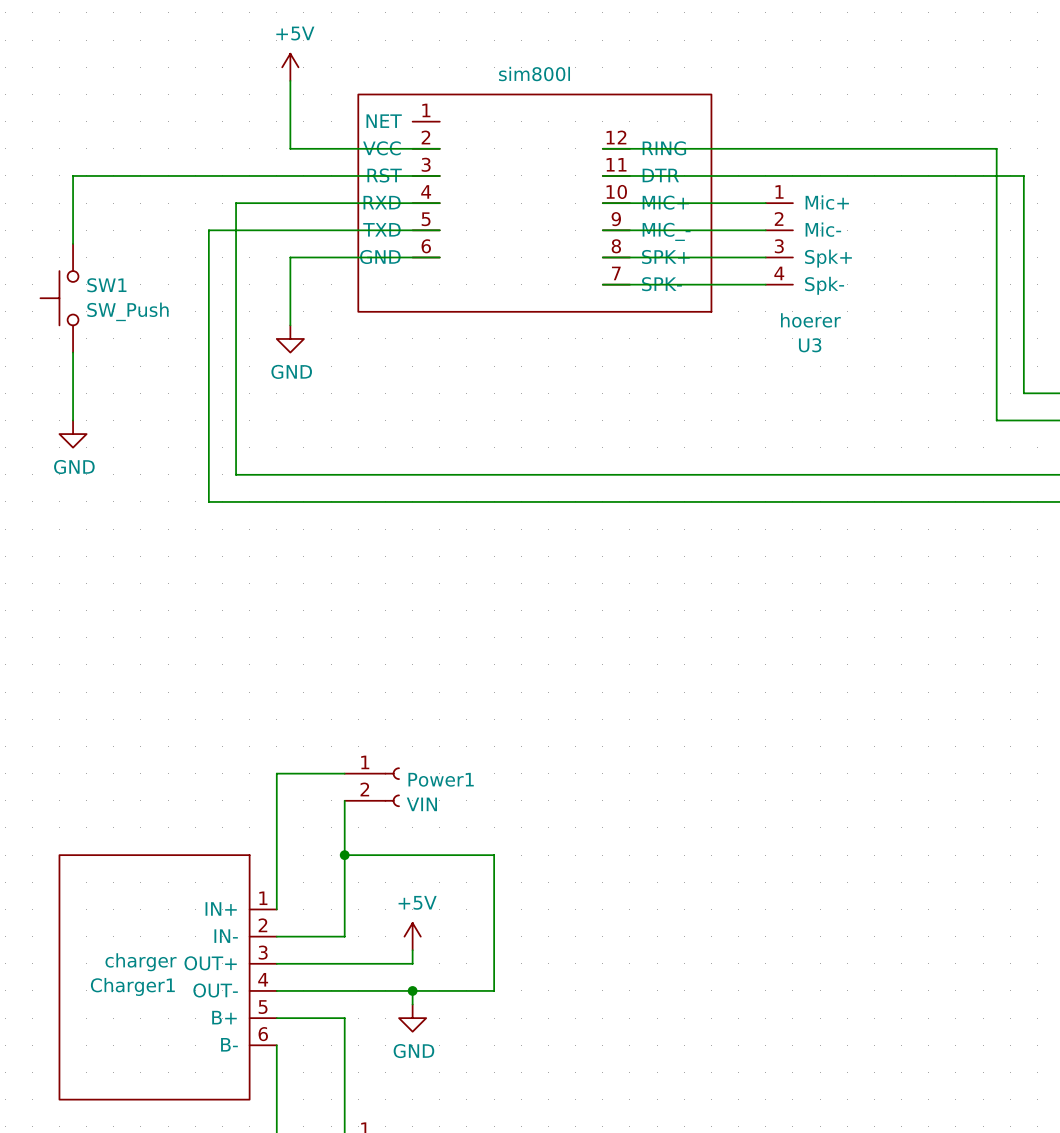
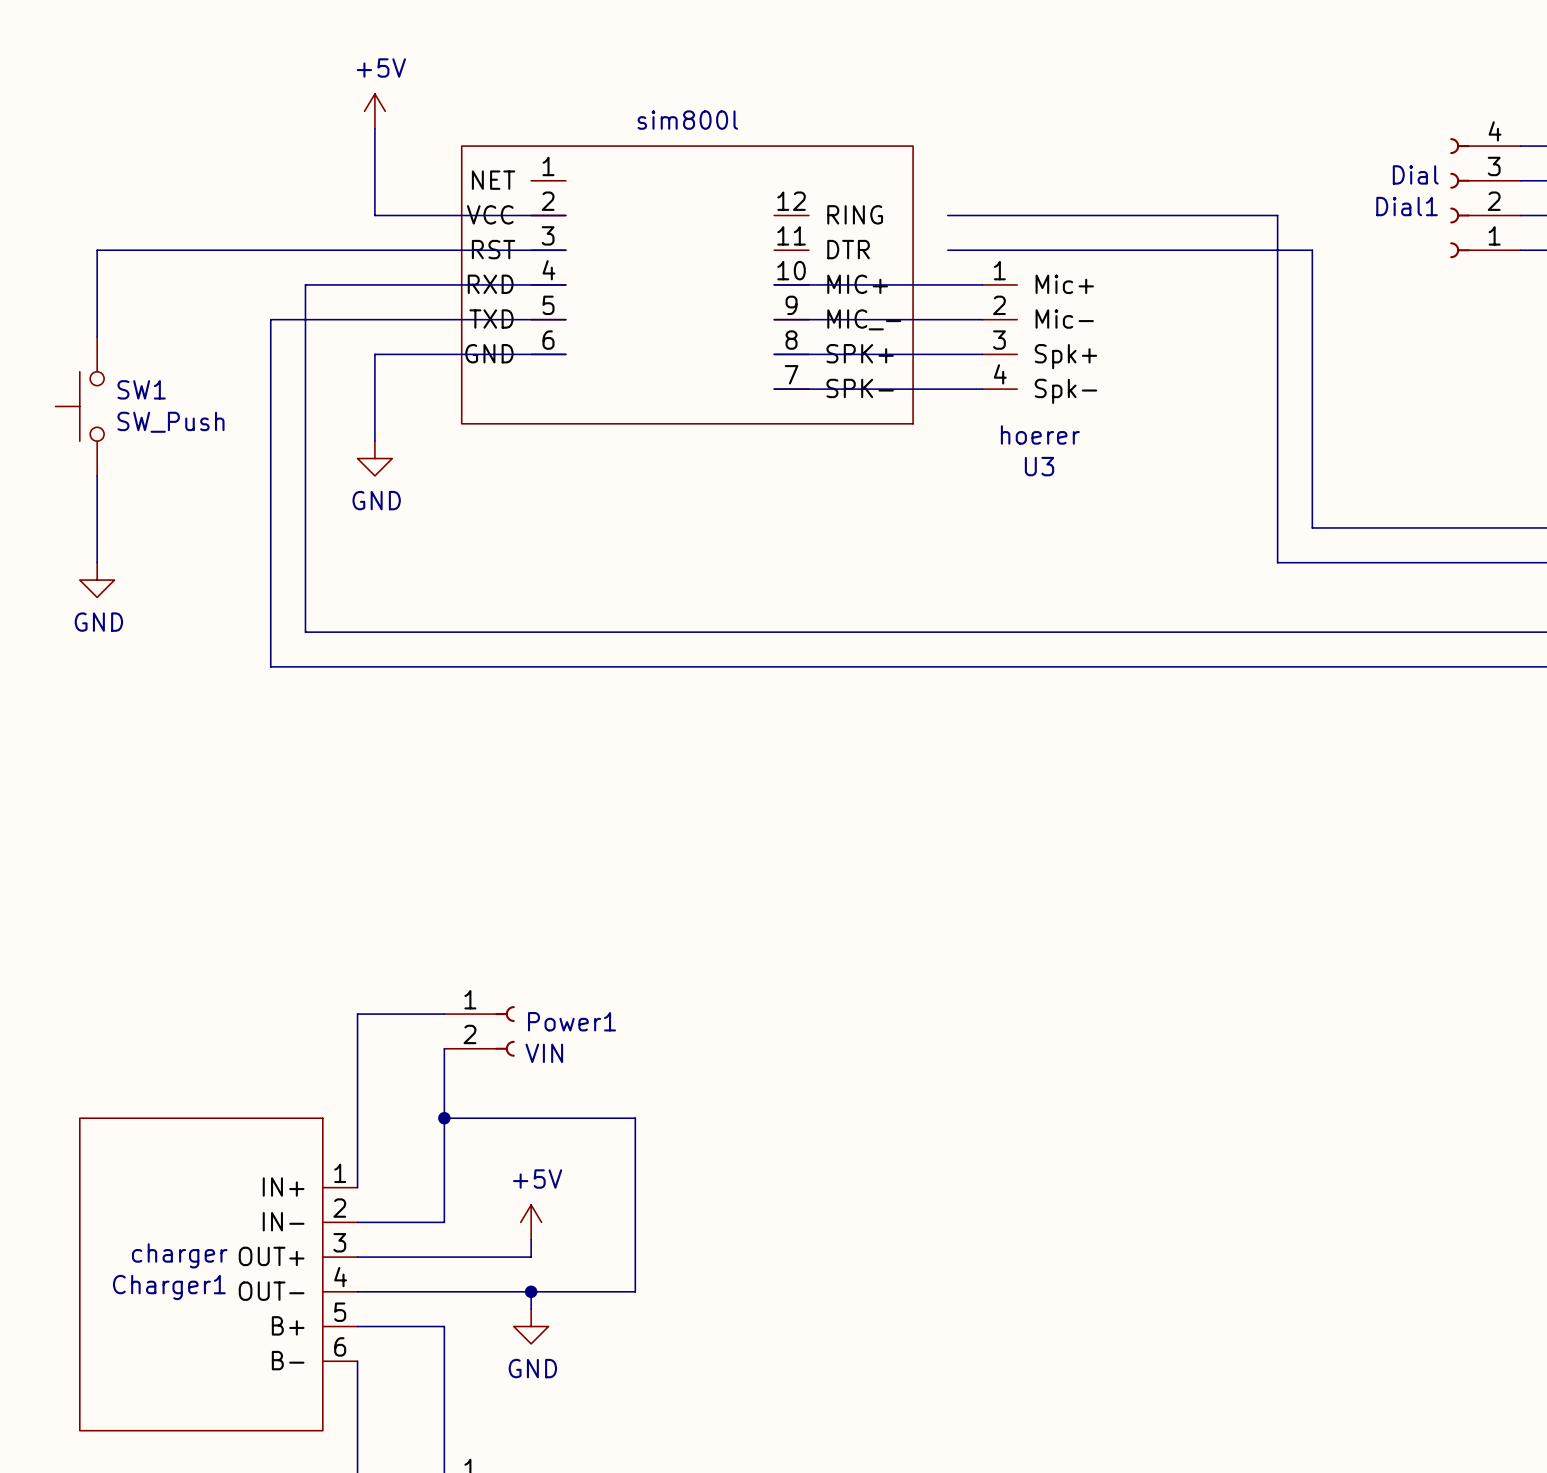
wire: (602, 148) (738, 148) -> none
wire: (602, 175) (738, 175) -> none

